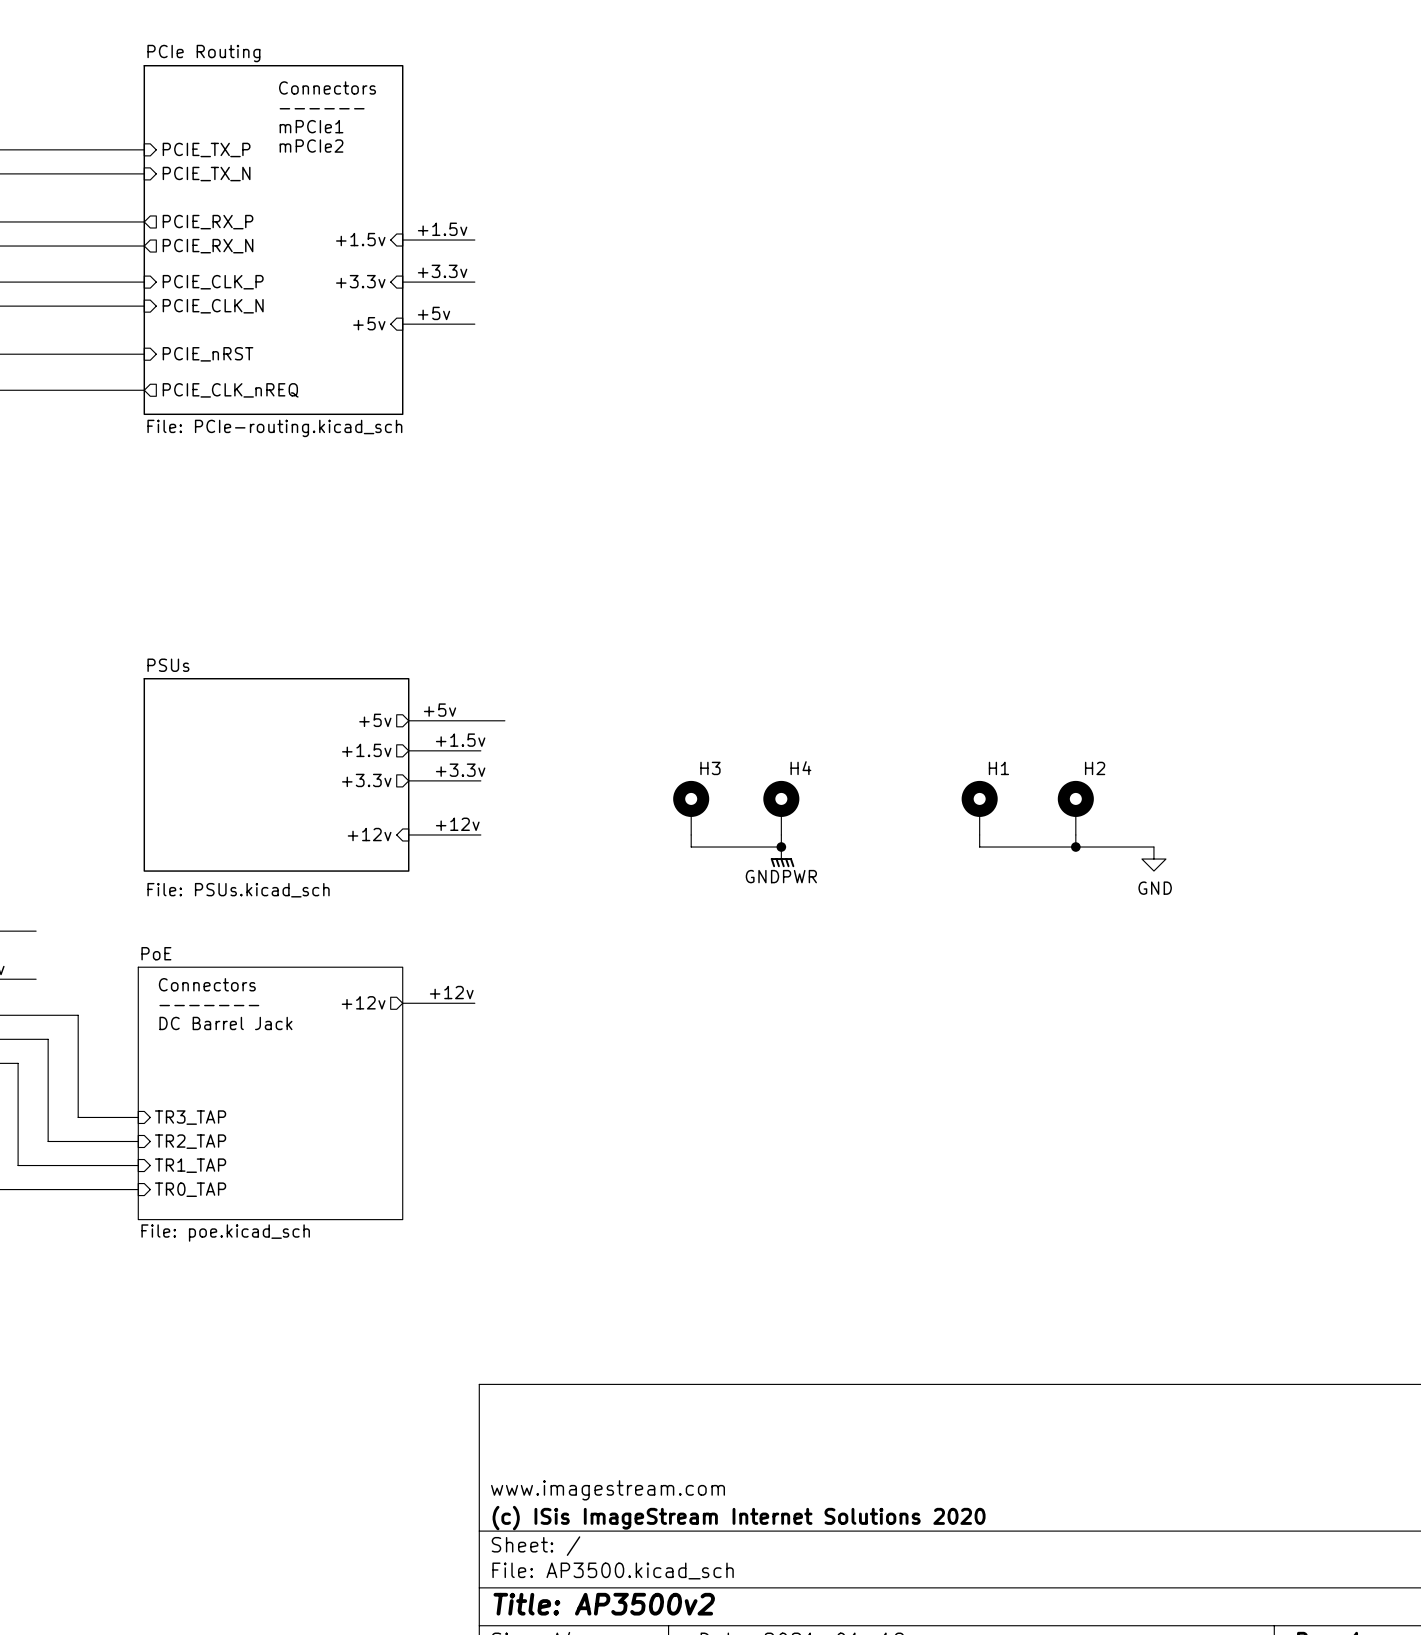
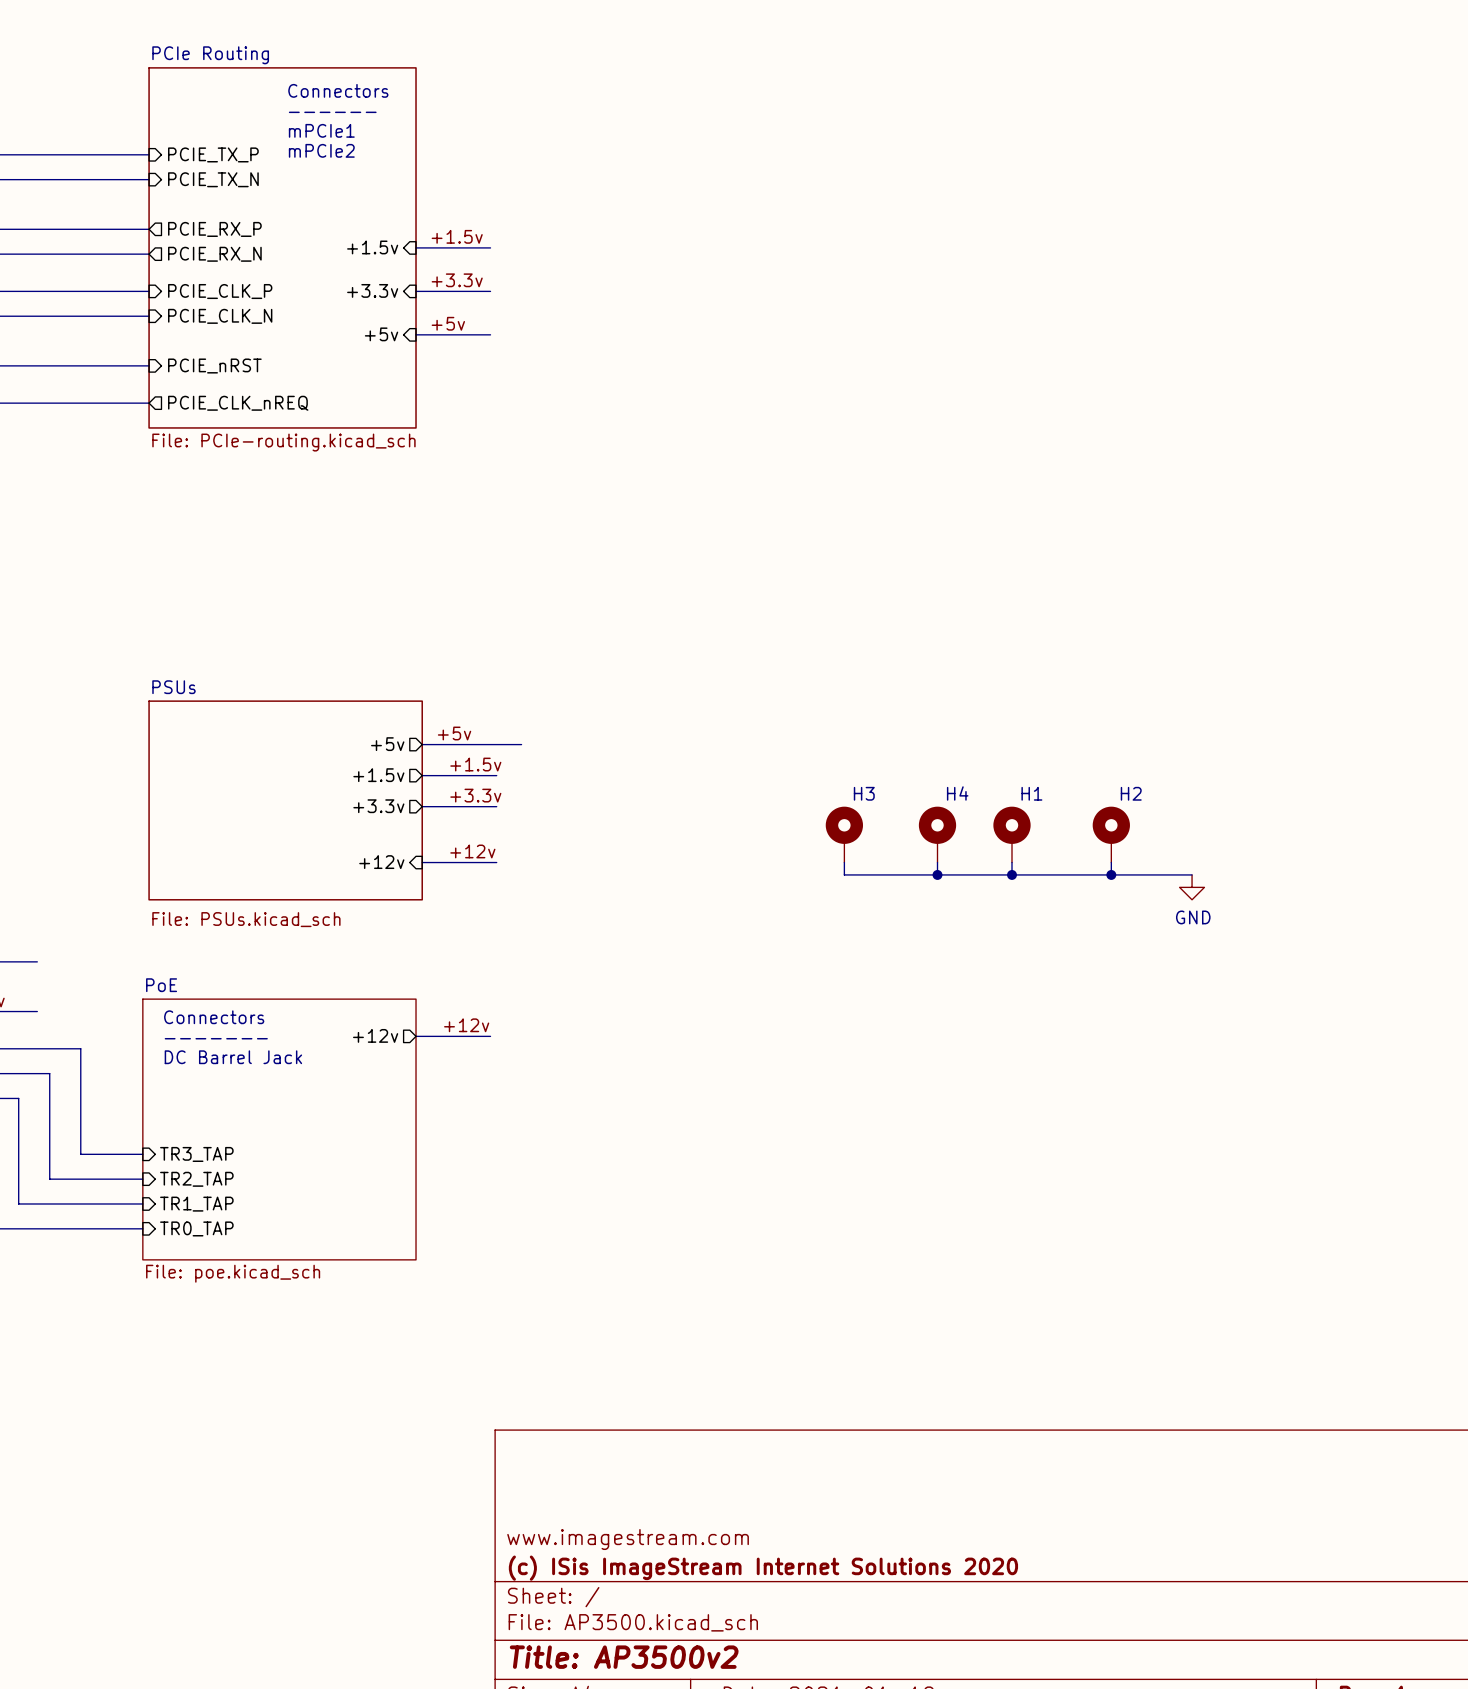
H3 position: (691, 807) -> (844, 834)
H4 position: (781, 807) -> (937, 834)
wire: (691, 834) (691, 847) (781, 847) (781, 834) -> none
wire: none -> (844, 862) (844, 874) (1011, 874)
wire: none -> (937, 862) (937, 874)
junction: (781, 847) -> none
junction: none -> (937, 874)
junction: none -> (1011, 874)
power symbol: GNDPWR (782, 857) -> none

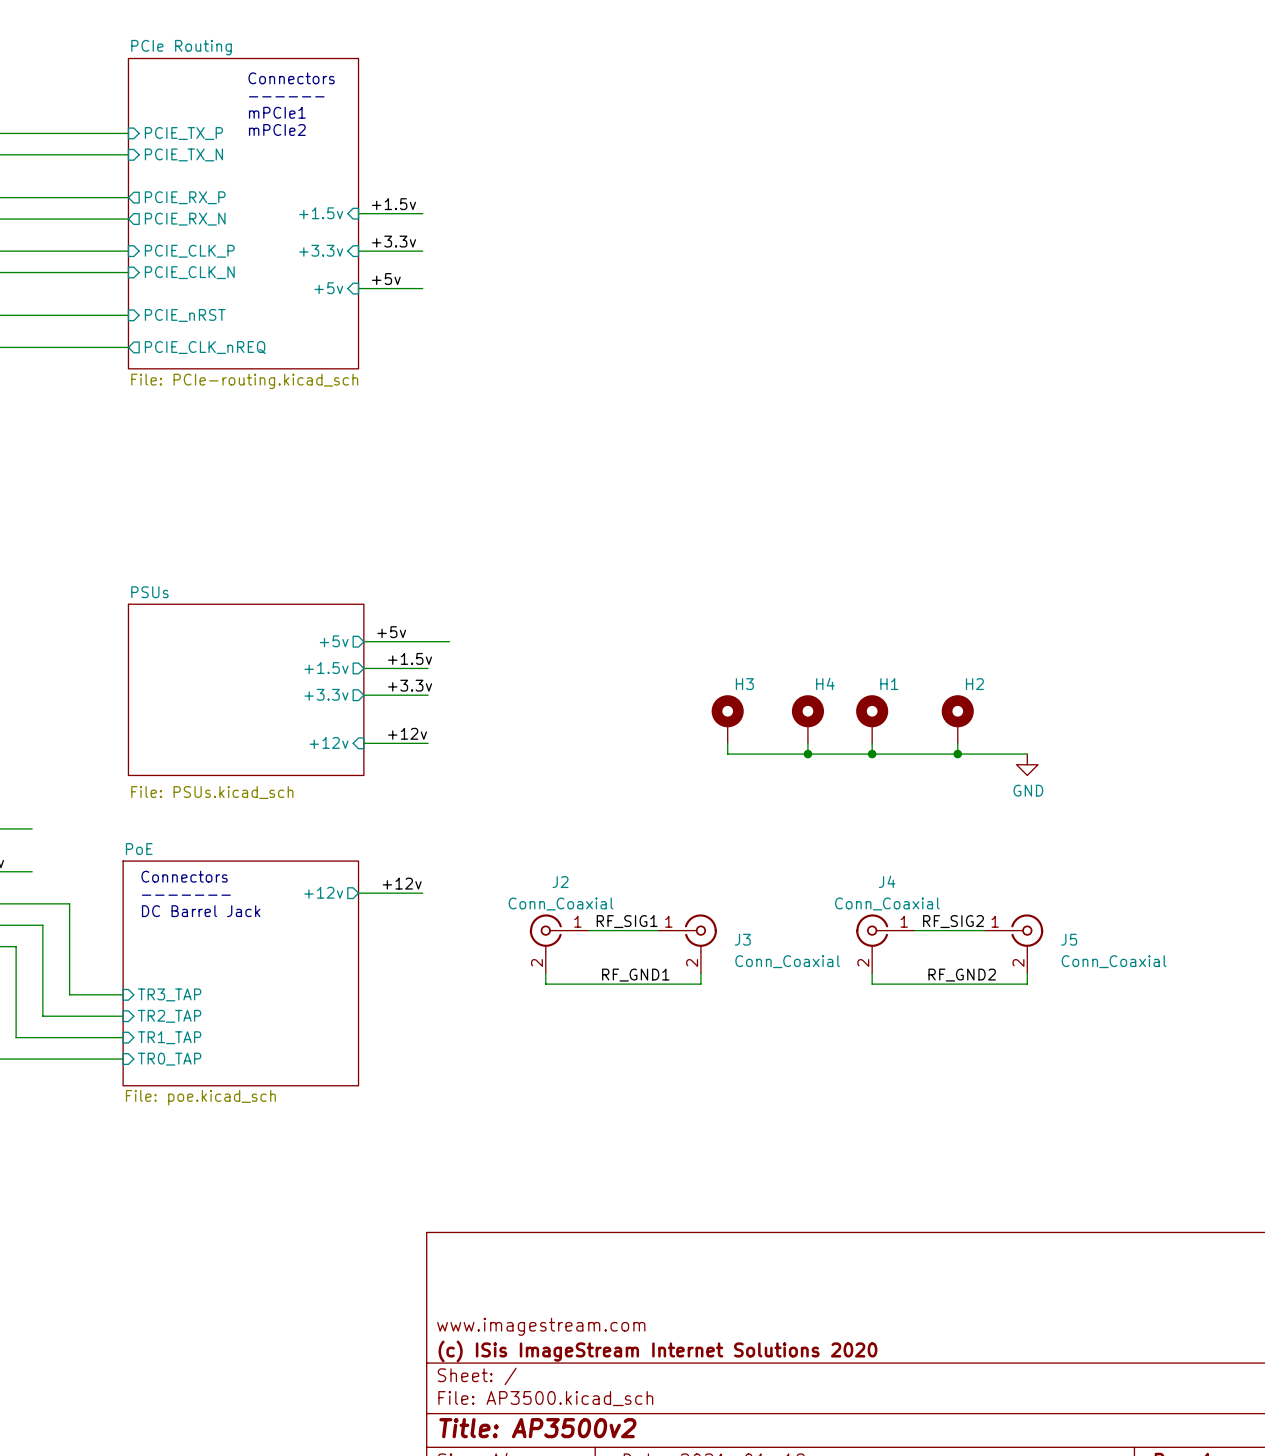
label: none -> RF_SIG1 (627, 921)
label: none -> RF_SIG2 (953, 921)
wire: none -> (588, 930) (658, 930)
wire: none -> (914, 930) (984, 930)
J2: none -> Conn_Coaxial (559, 943)
J3: none -> Conn_Coaxial (687, 943)
J4: none -> Conn_Coaxial (885, 943)
J5: none -> Conn_Coaxial (1013, 943)
wire: none -> (545, 973) (545, 984) (700, 984) (700, 973)
wire: none -> (872, 973) (872, 984) (1027, 984) (1027, 973)
label: none -> RF_GND1 (635, 975)
label: none -> RF_GND2 (962, 975)

